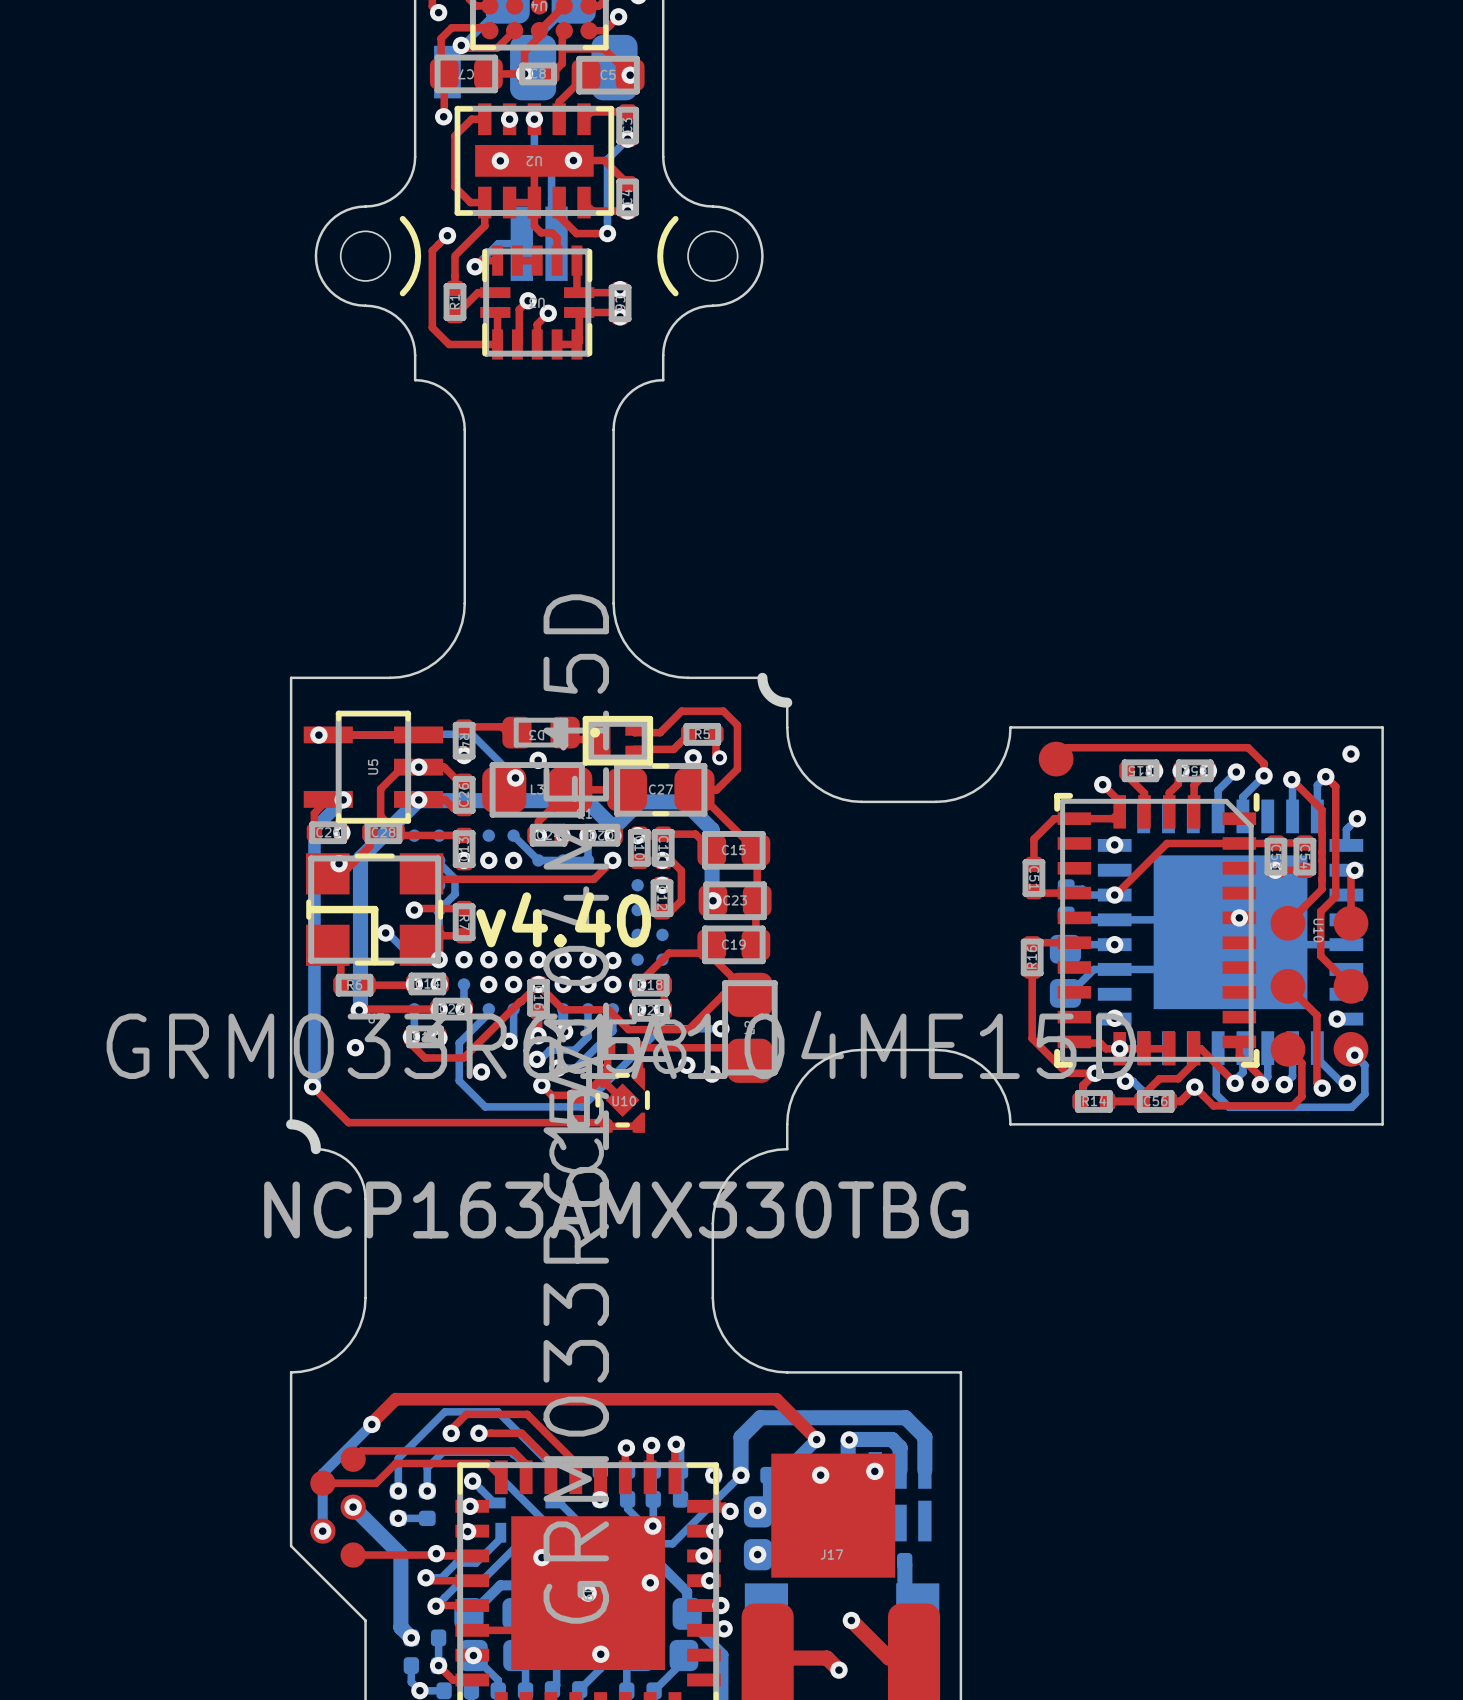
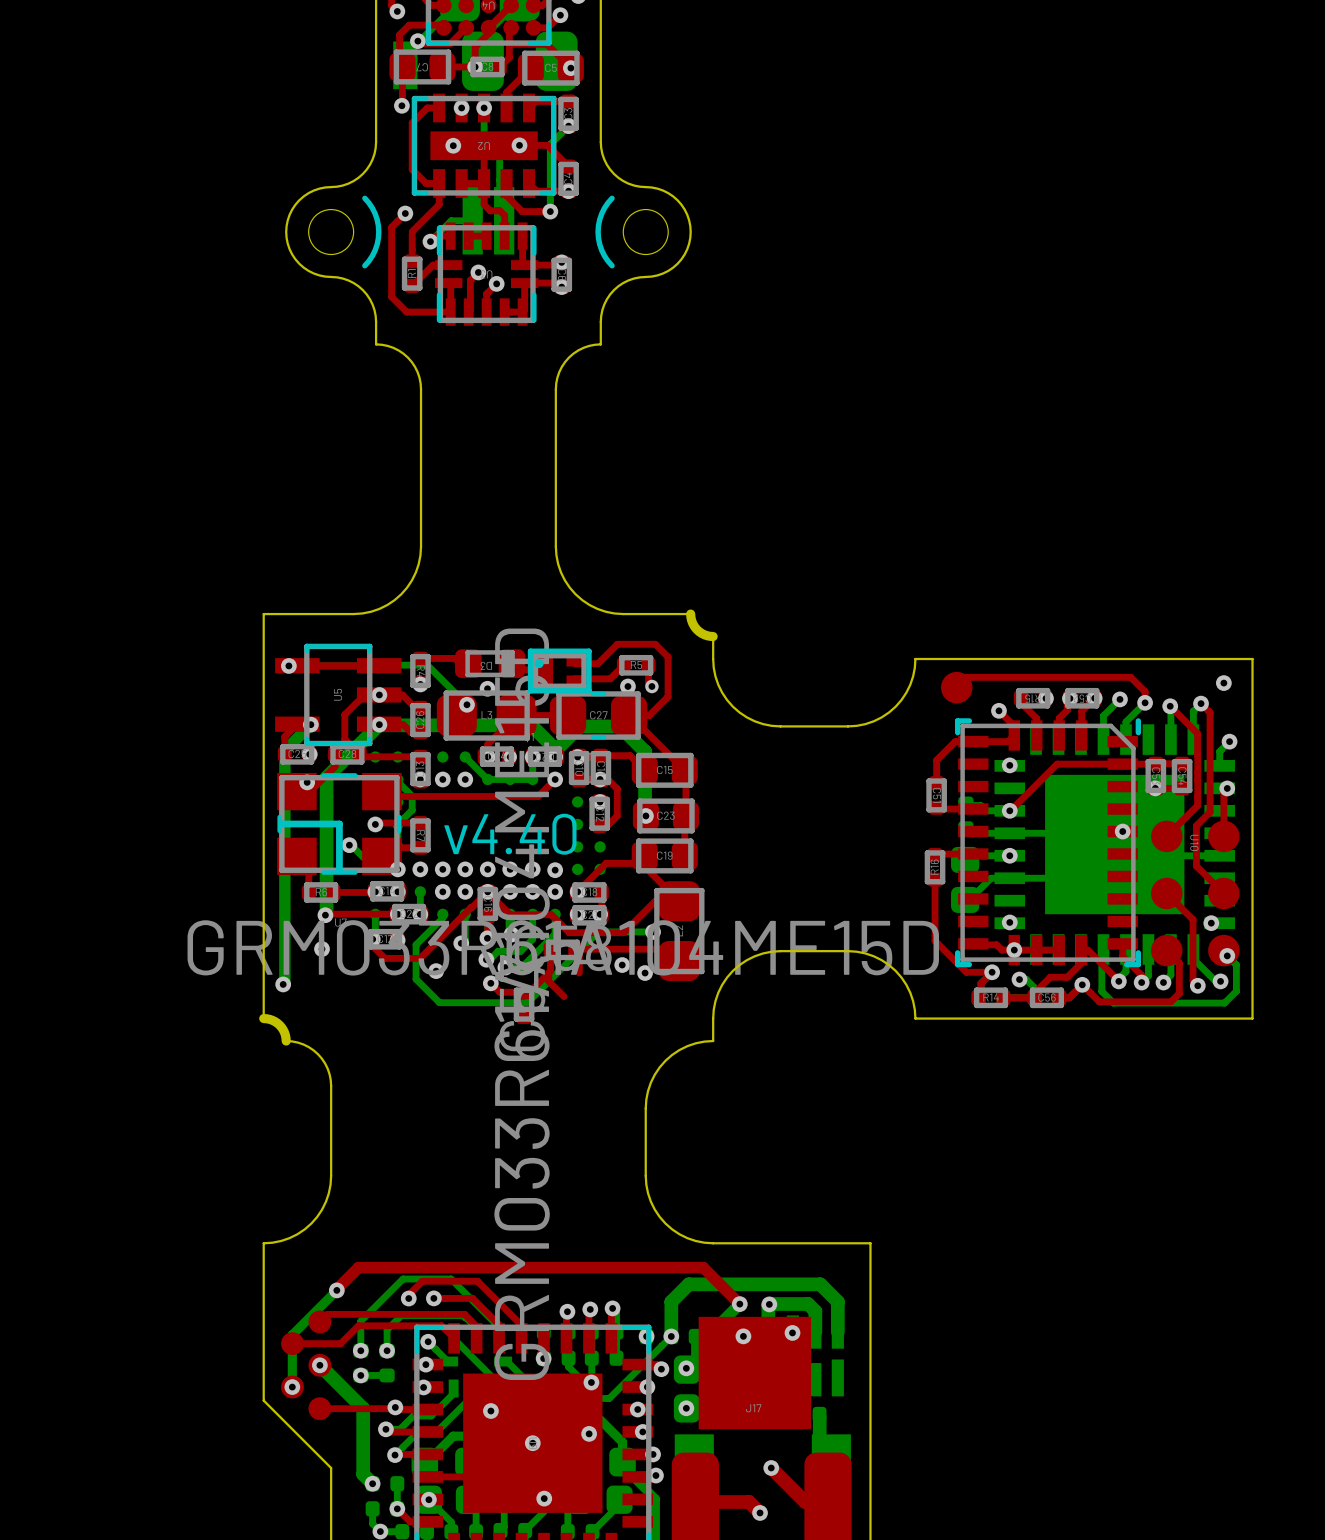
top track: (312, 1086) (348, 1122) (602, 1122) (605, 1126) (639, 1126) -> none
U10: NCP163AMX330TBG (622, 1100) -> none

